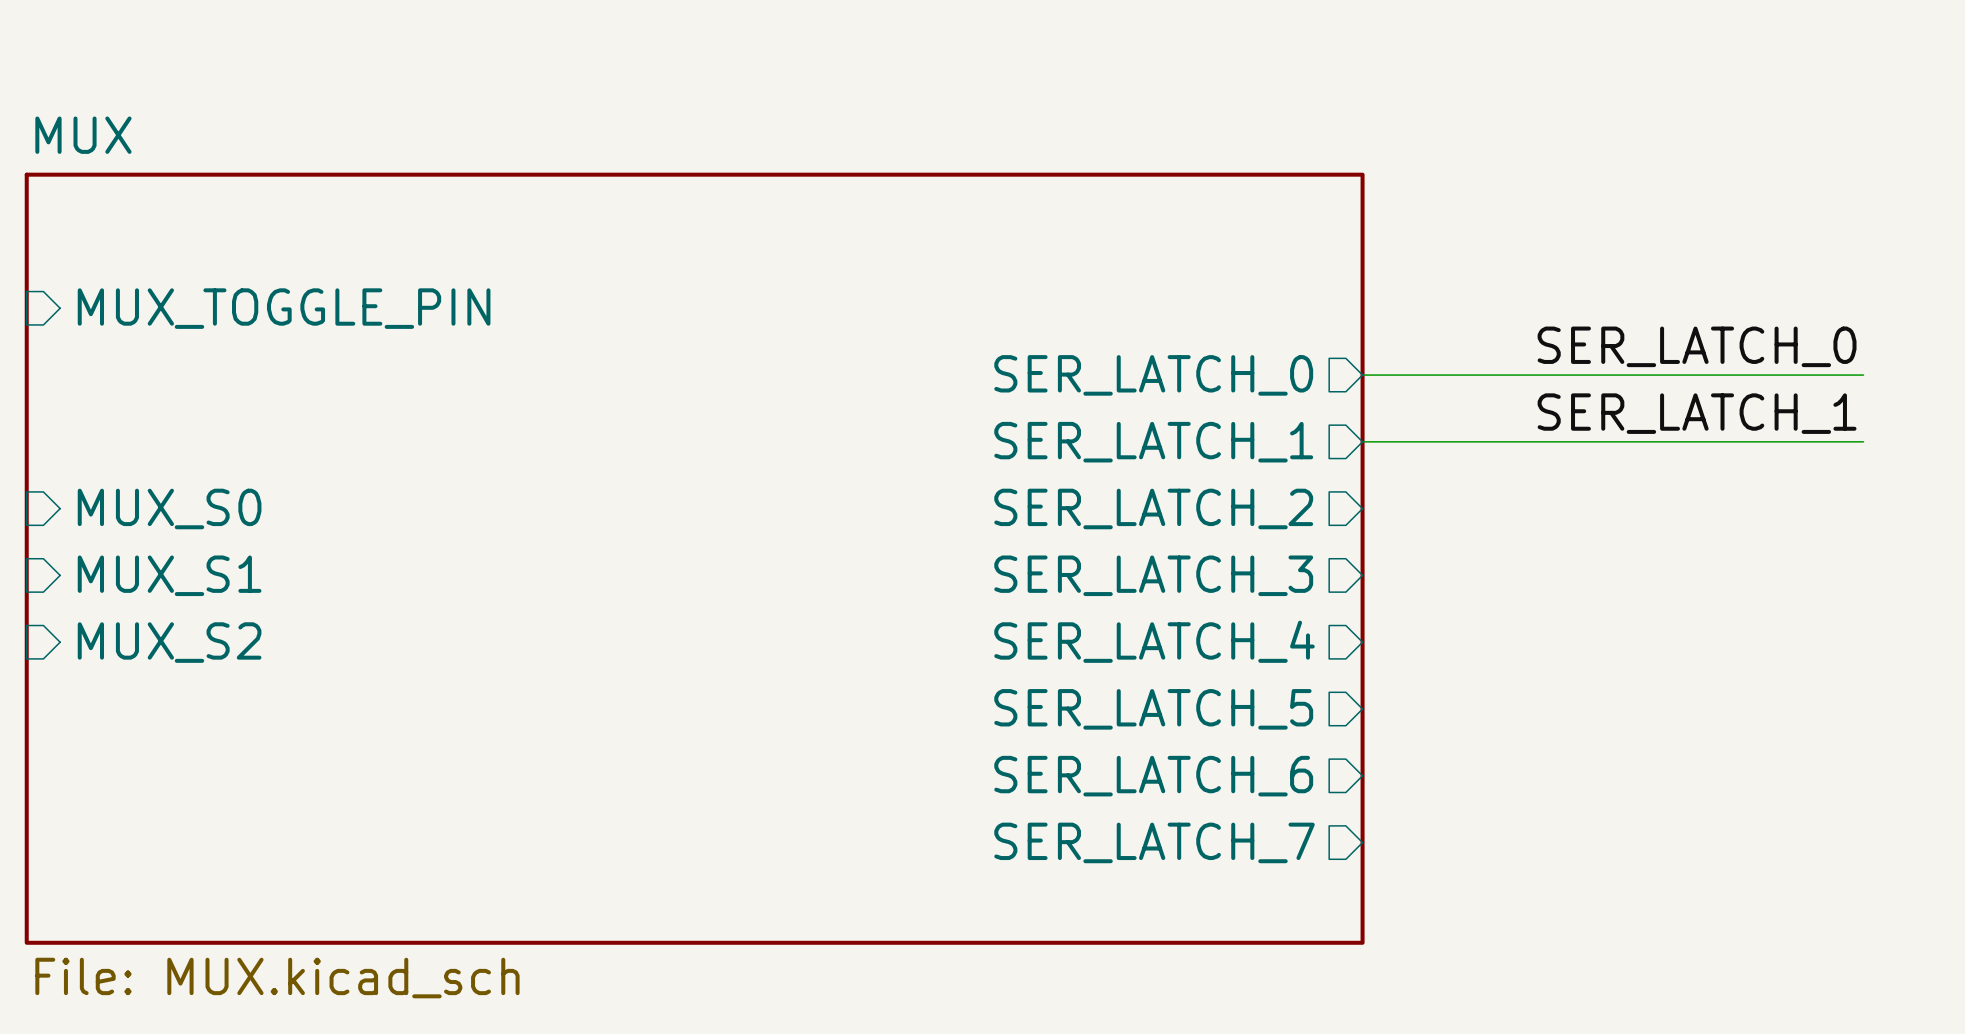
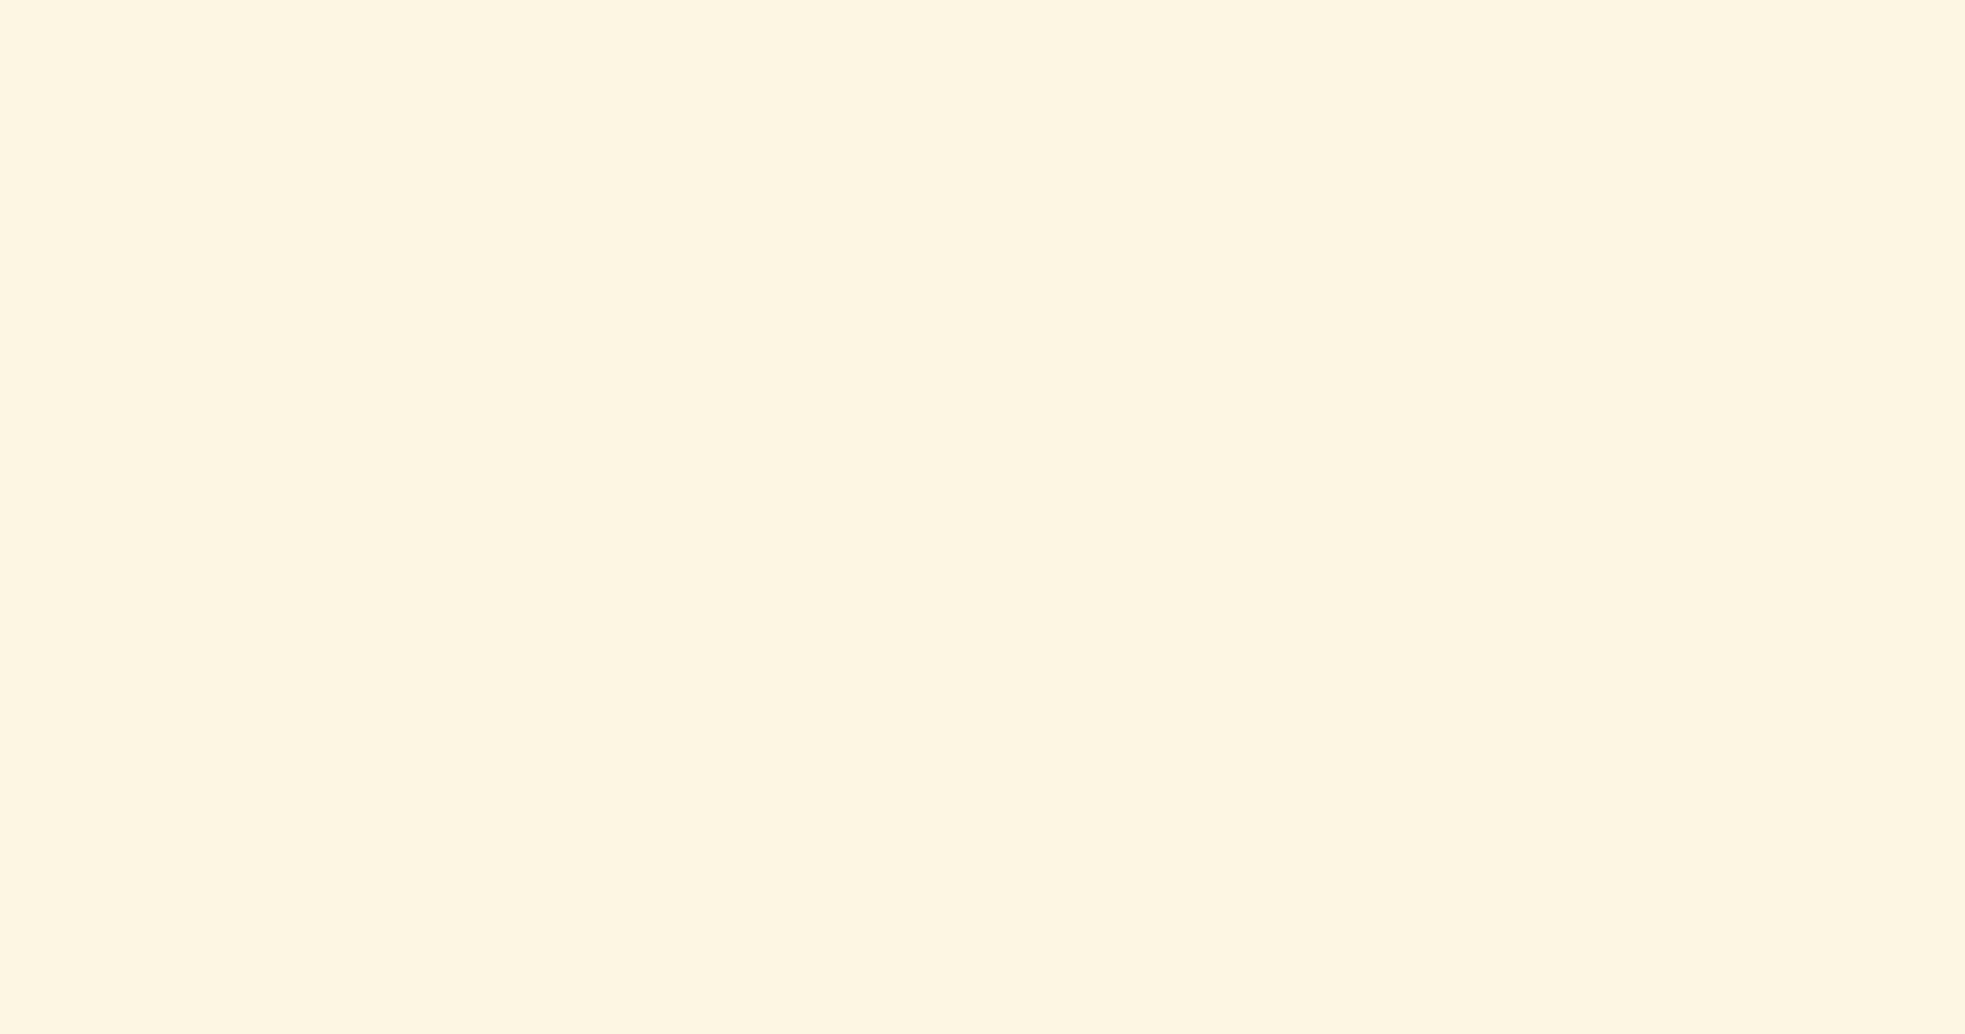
sheet pin: MUX_TOGGLE_PIN (284, 308) -> none
label: SER_LATCH_0 (1697, 346) -> none
sheet pin: SER_LATCH_0 (1153, 375) -> none
wire: (1362, 375) (1863, 375) -> none
label: SER_LATCH_1 (1697, 413) -> none
wire: (1362, 441) (1863, 441) -> none
sheet pin: SER_LATCH_1 (1153, 442) -> none
sheet pin: MUX_S0 (169, 508) -> none
sheet pin: SER_LATCH_2 (1153, 508) -> none
sheet MUX: File: MUX.kicad_sch (694, 558) -> none
sheet pin: MUX_S1 (169, 575) -> none
sheet pin: SER_LATCH_3 (1153, 575) -> none
sheet pin: SER_LATCH_4 (1154, 641) -> none
sheet pin: MUX_S2 (169, 642) -> none
sheet pin: SER_LATCH_5 (1153, 709) -> none
sheet pin: SER_LATCH_6 (1153, 776) -> none
sheet pin: SER_LATCH_7 (1154, 842) -> none

